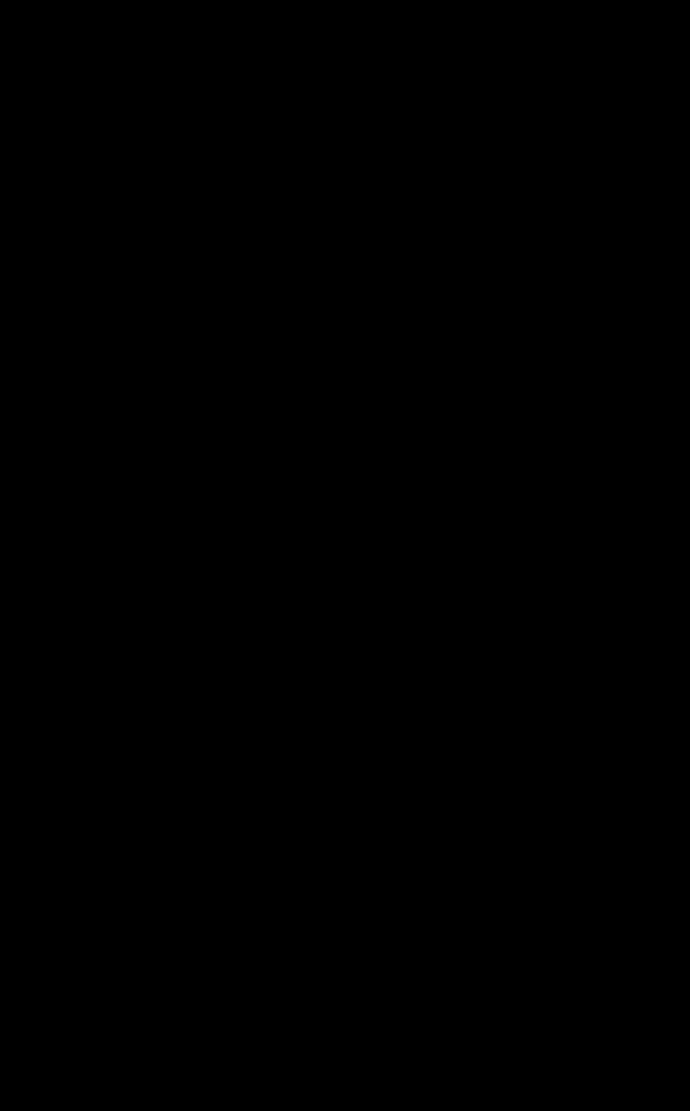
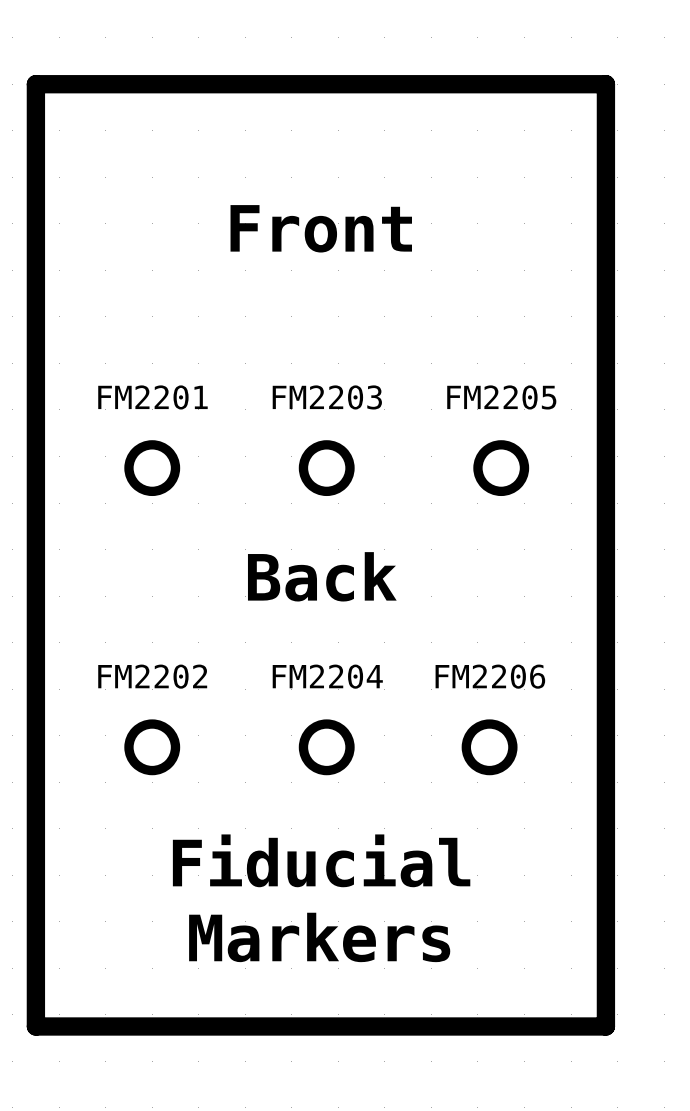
line: none -> (35, 84) (605, 84) (605, 1026) (35, 1026) (35, 84)
text: none -> Front (321, 228)
FM2201: none -> (152, 468)
FM2203: none -> (326, 468)
FM2205: none -> (501, 468)
text: none -> Back (322, 576)
FM2202: none -> (152, 747)
FM2204: none -> (326, 747)
FM2206: none -> (489, 747)
text: none -> Fiducial (321, 860)
text: none -> Markers (319, 937)

